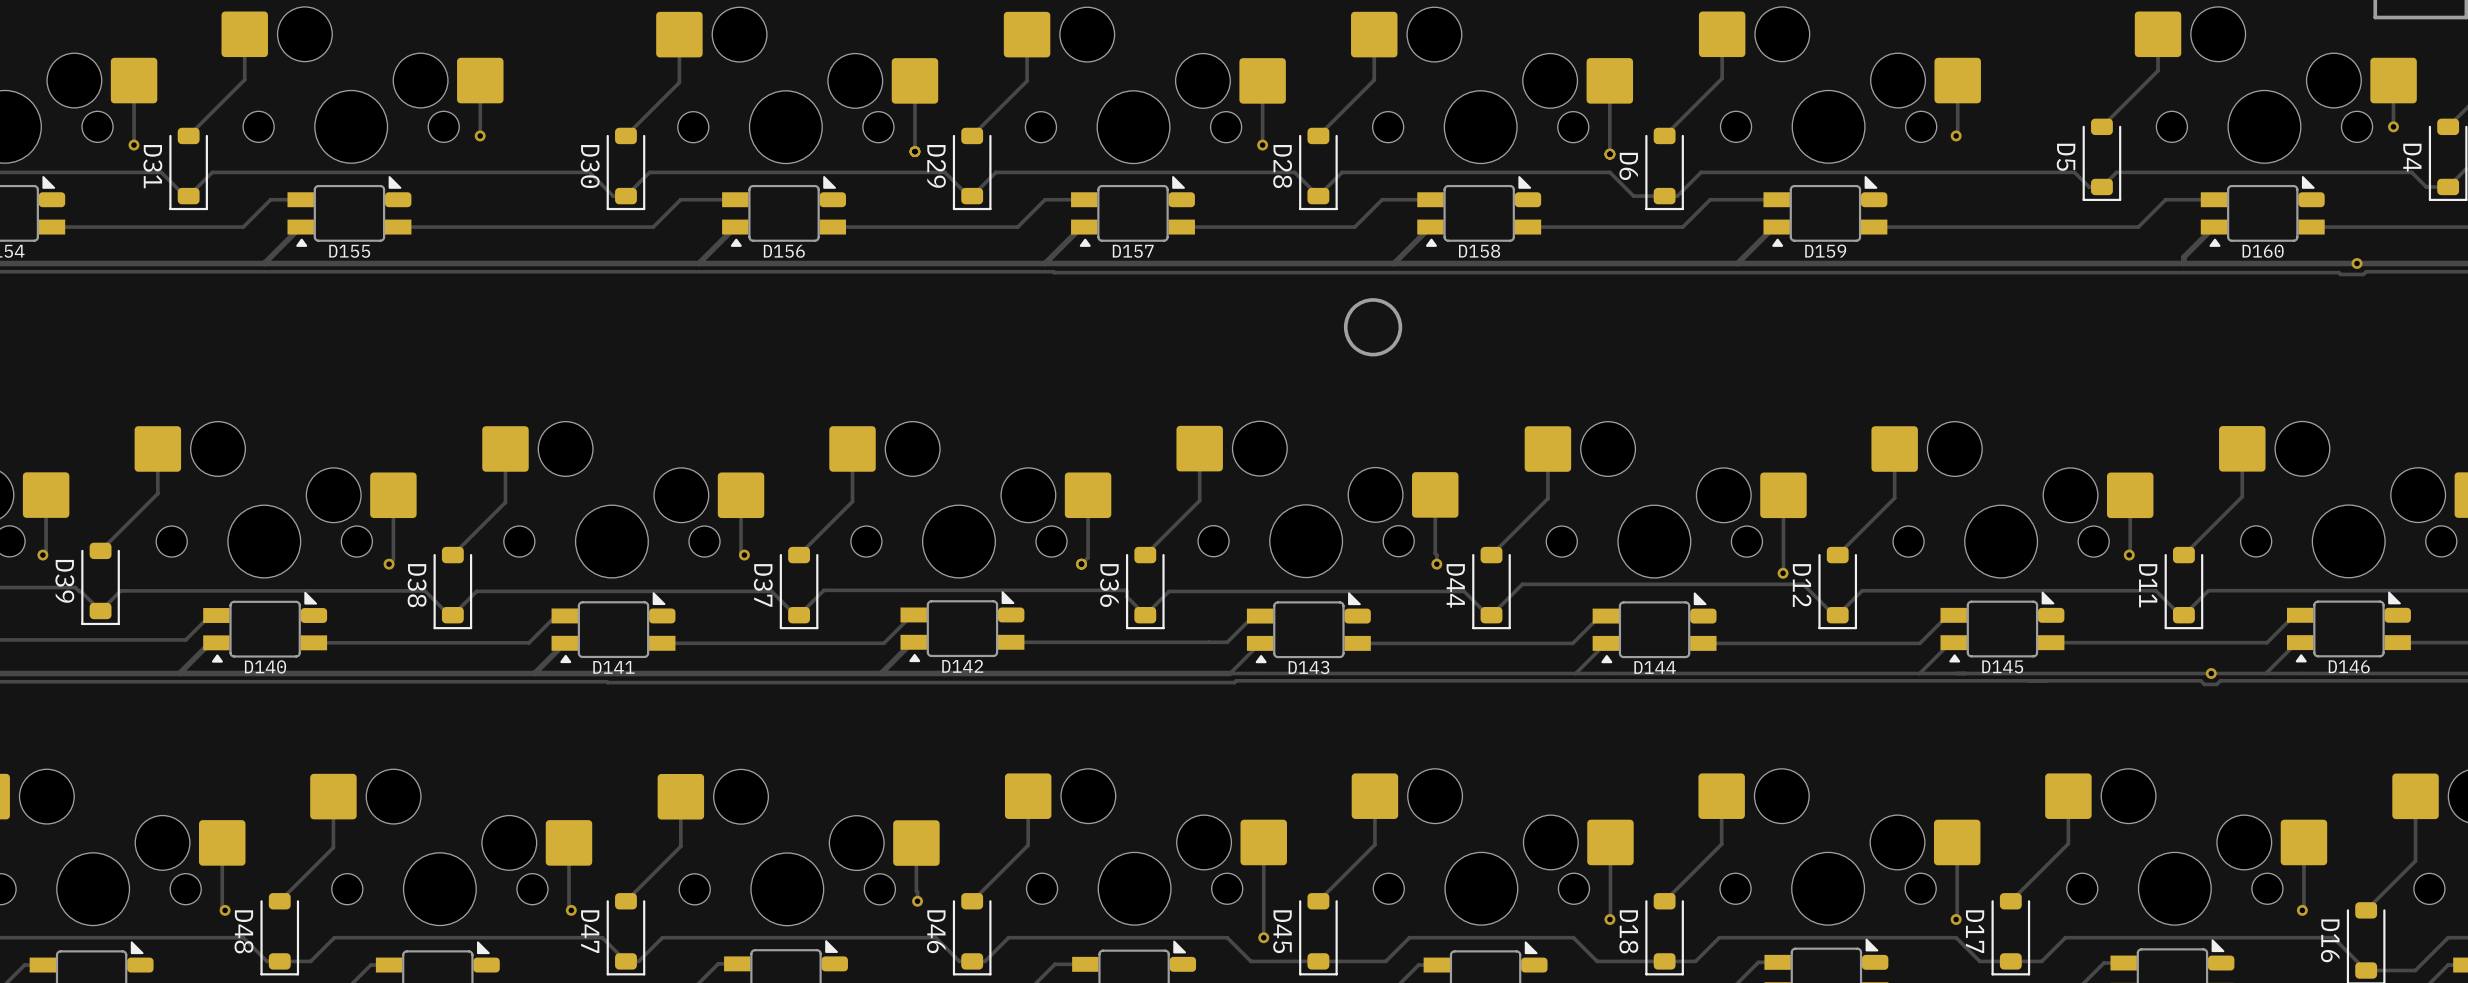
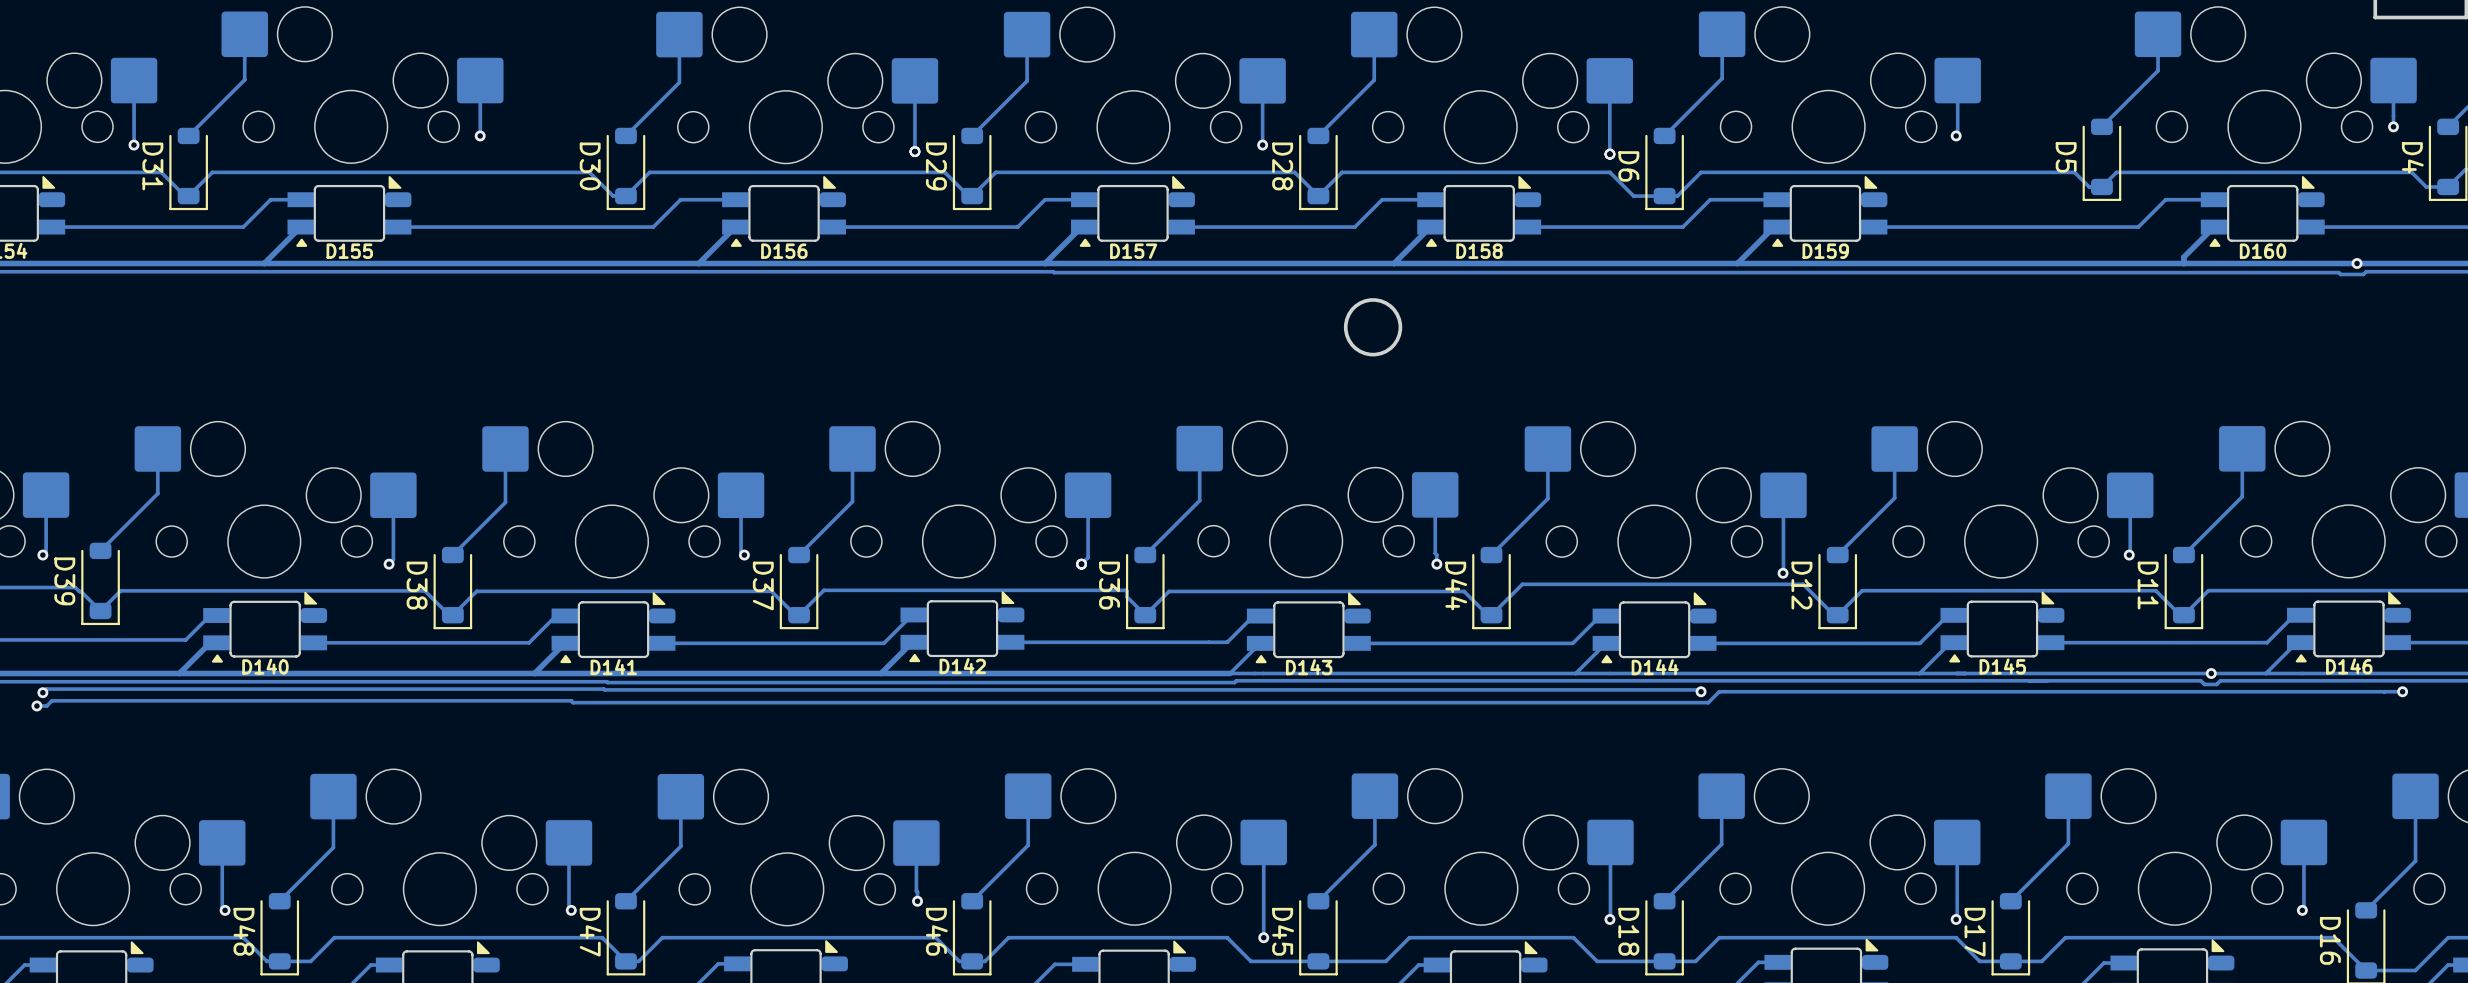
track: none -> (1701, 691) (1699, 689) (46, 689) (42, 692)
via: none -> (1701, 691)
track: none -> (2402, 691) (1719, 691) (1708, 702) (51, 700) (46, 706) (36, 706)
via: none -> (2402, 691)
via: none -> (42, 692)
via: none -> (36, 706)

